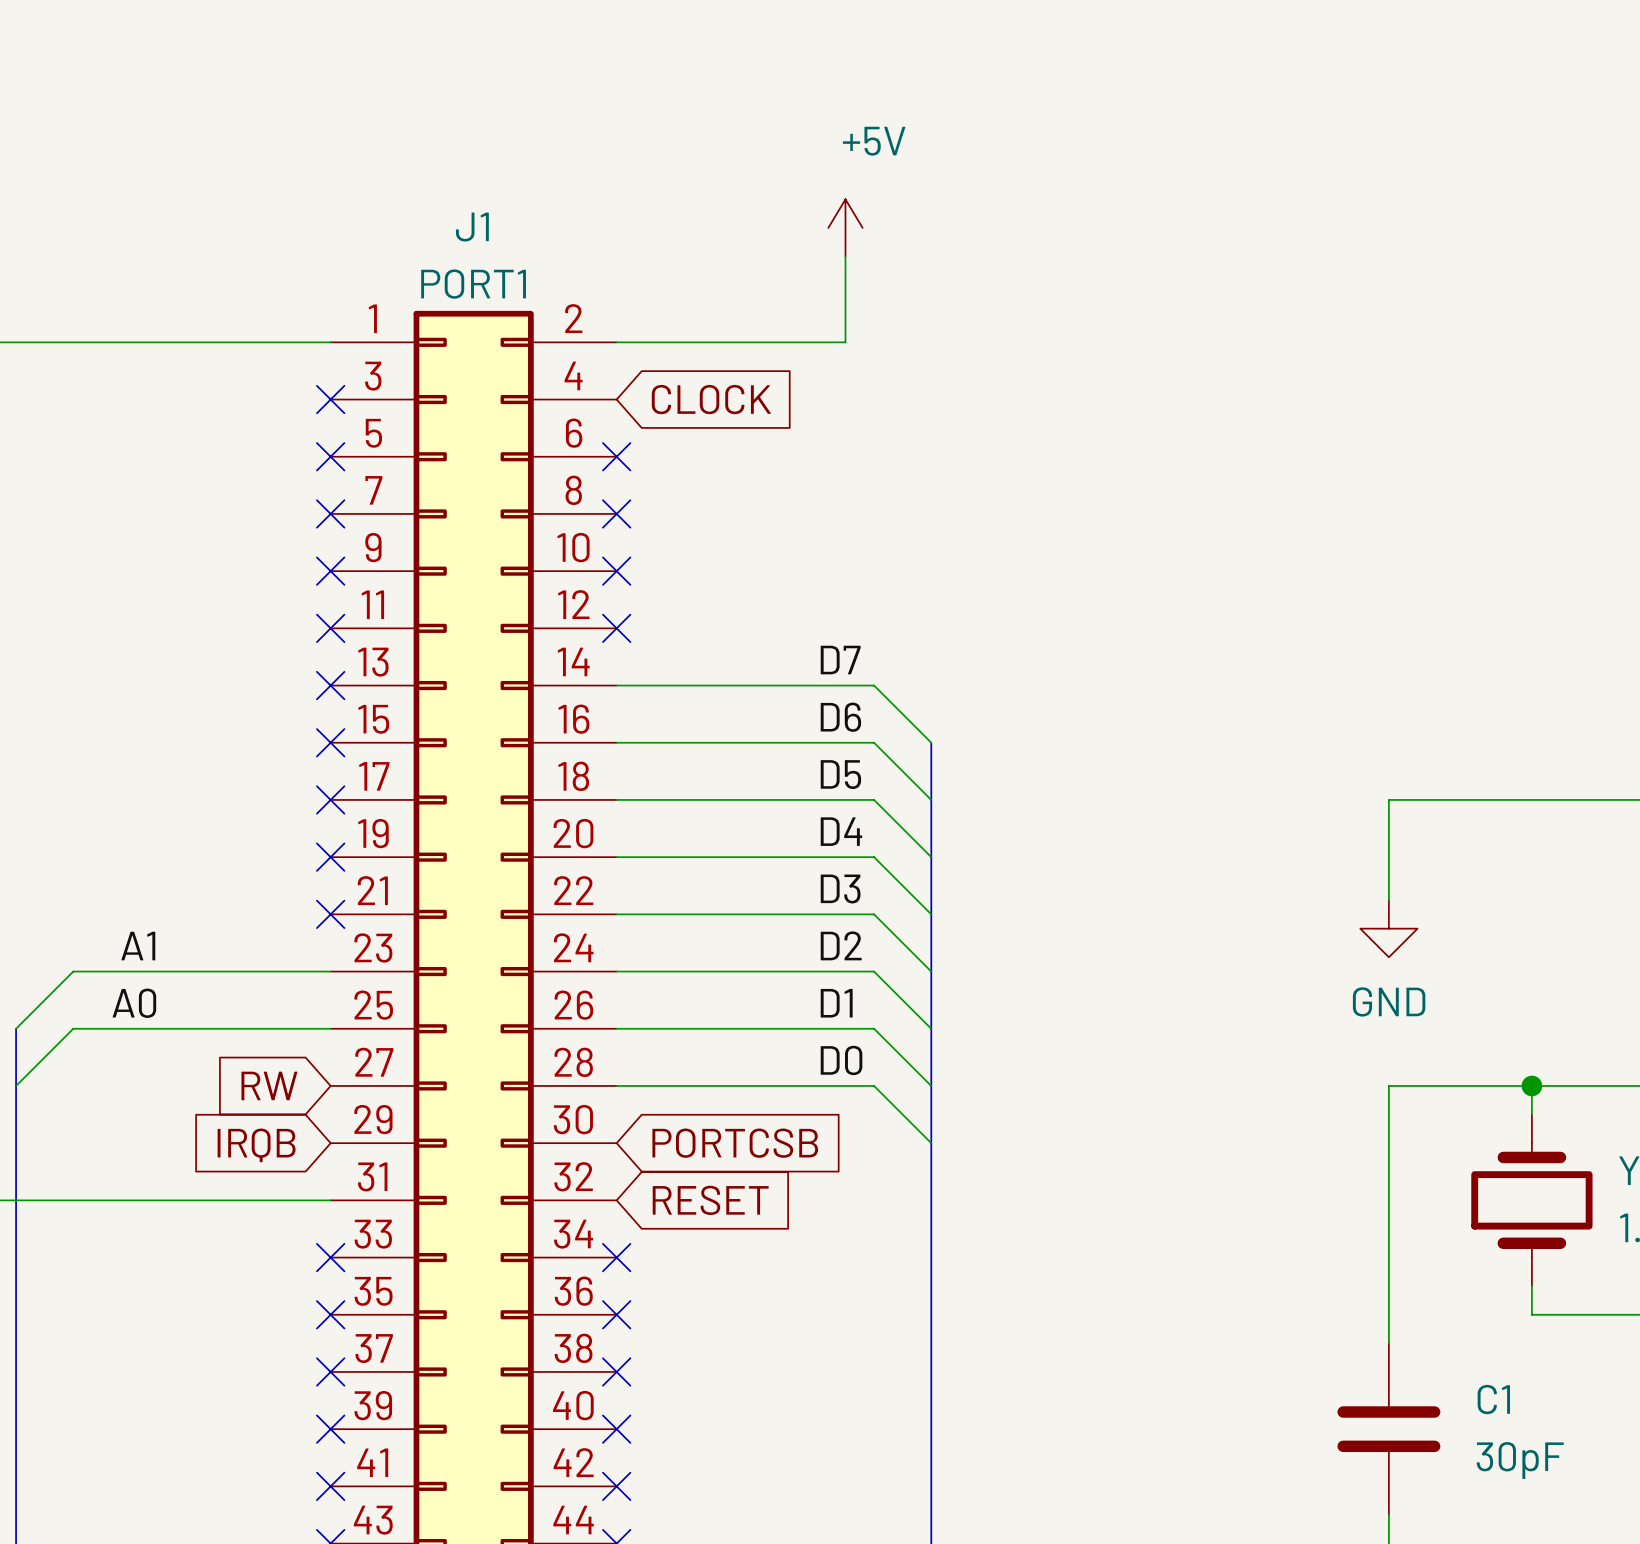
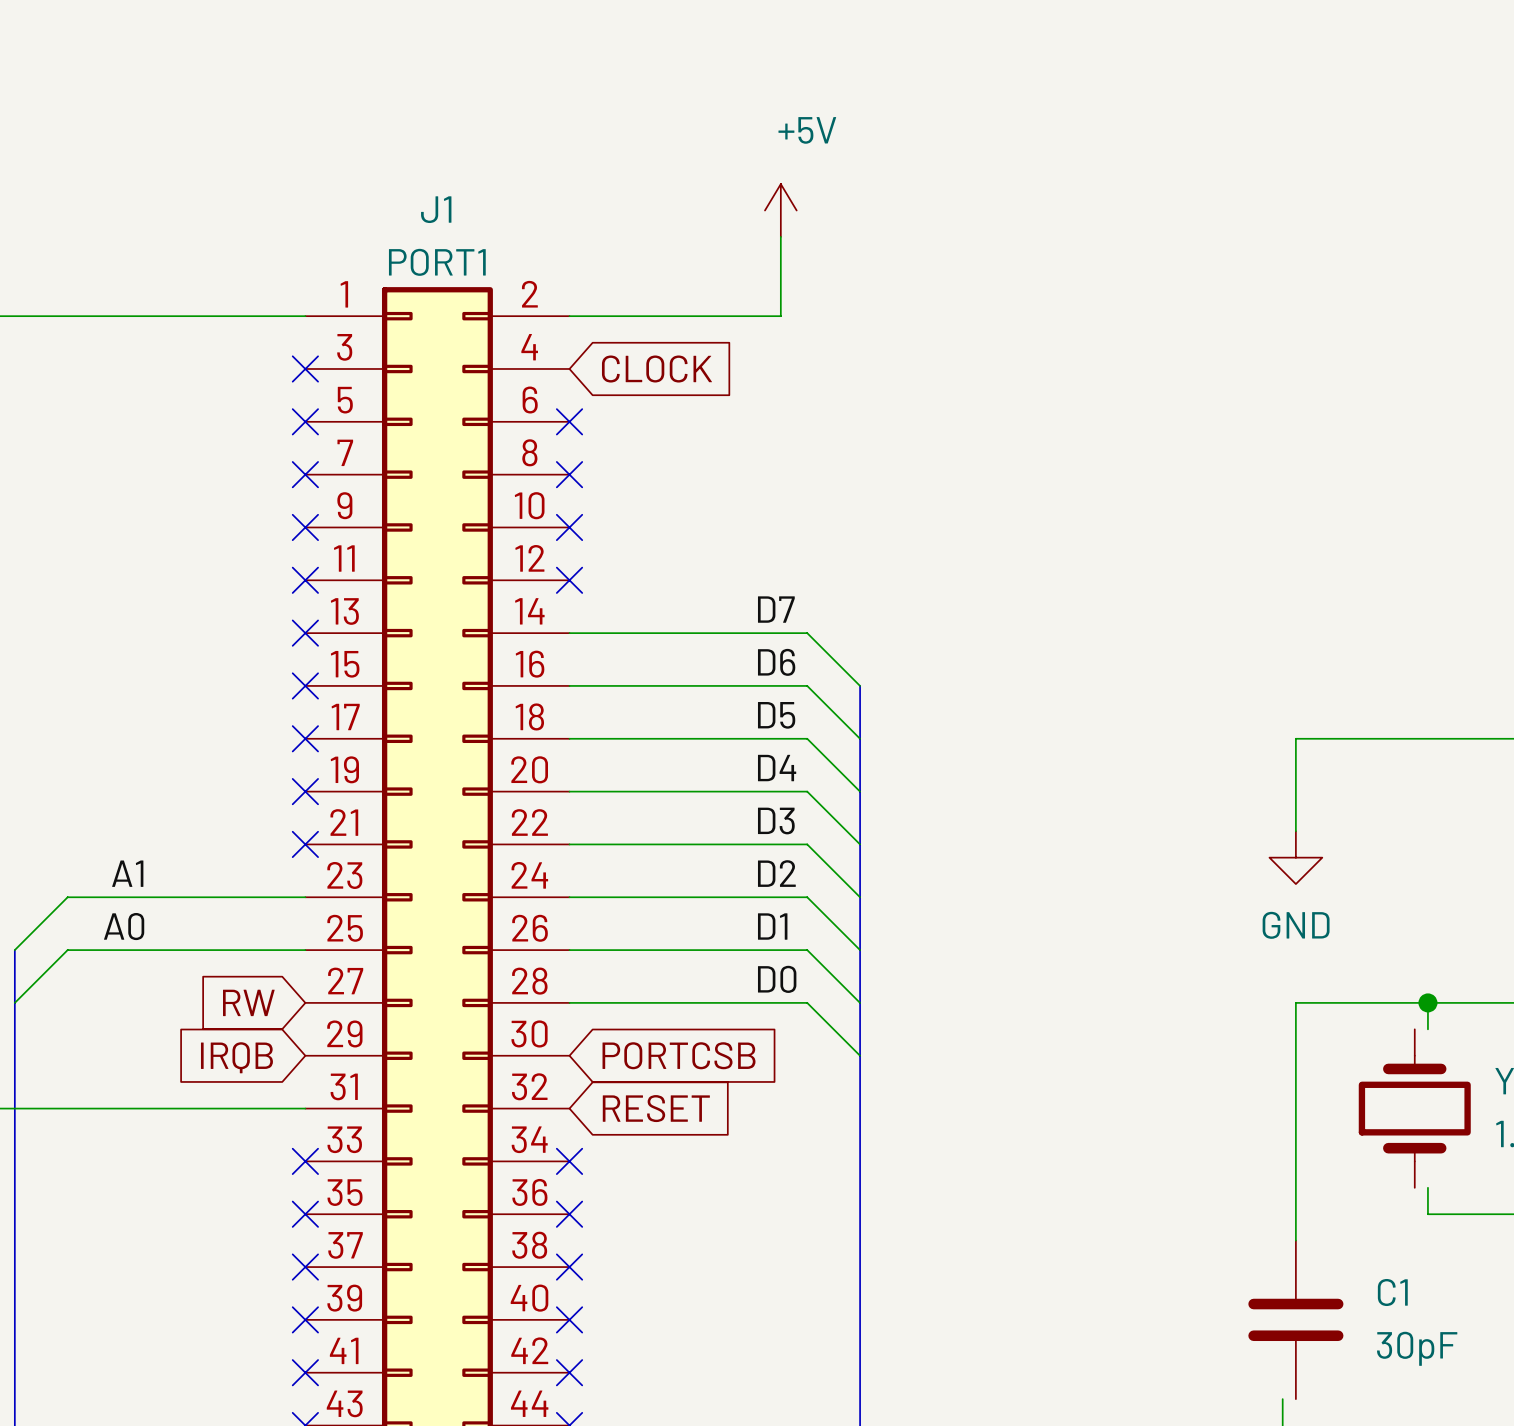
wire: (1403, 799) (1388, 799) (1388, 900) -> (1295, 738) (1295, 831)
power symbol position: GND (1388, 928) -> GND (1295, 857)
wire: (1403, 1085) (1388, 1085) (1388, 1343) -> (1295, 1002) (1295, 1240)
wire: (1531, 1085) (1531, 1114) -> (1427, 1002) (1427, 1029)
junction position: (1531, 1085) -> (1427, 1002)
wire: (1531, 1286) (1531, 1314) (1546, 1314) -> (1427, 1187) (1427, 1214)
C1 position: (1388, 1429) -> (1295, 1319)

